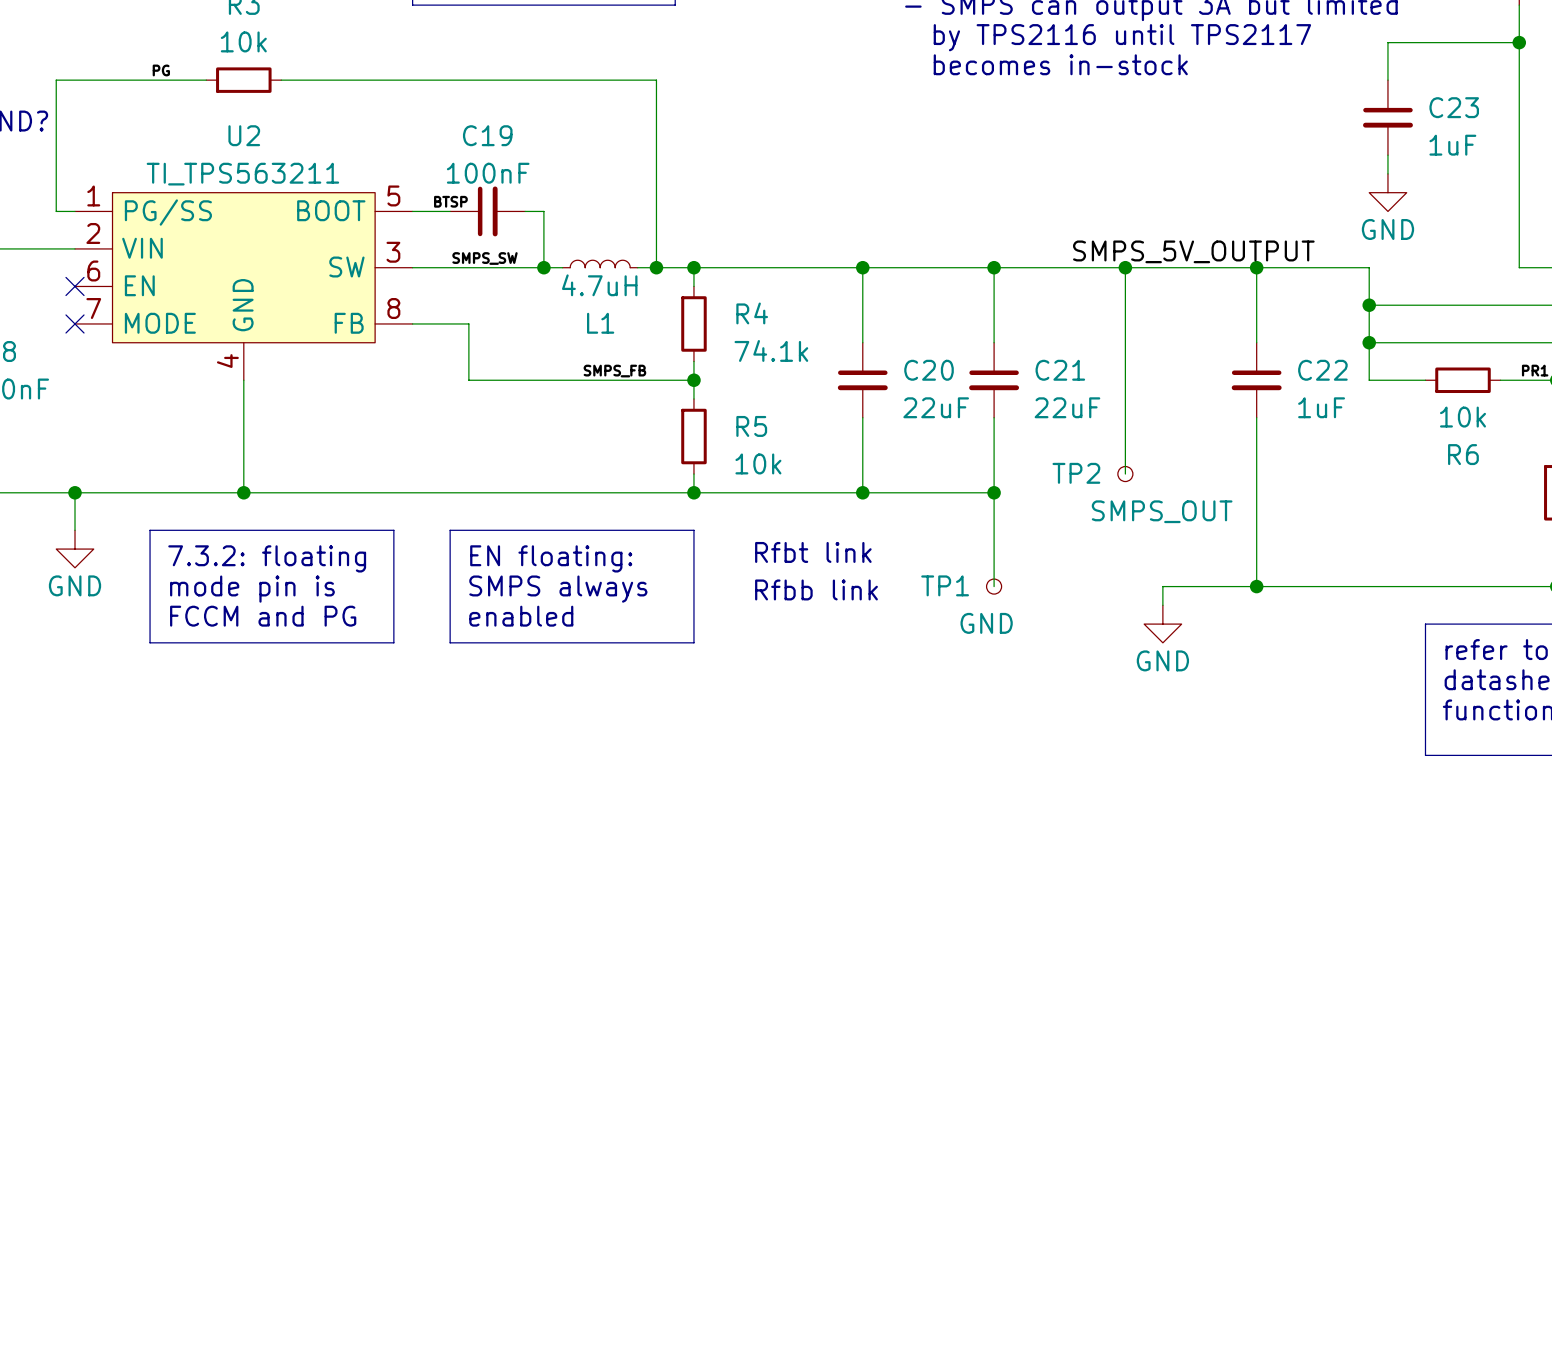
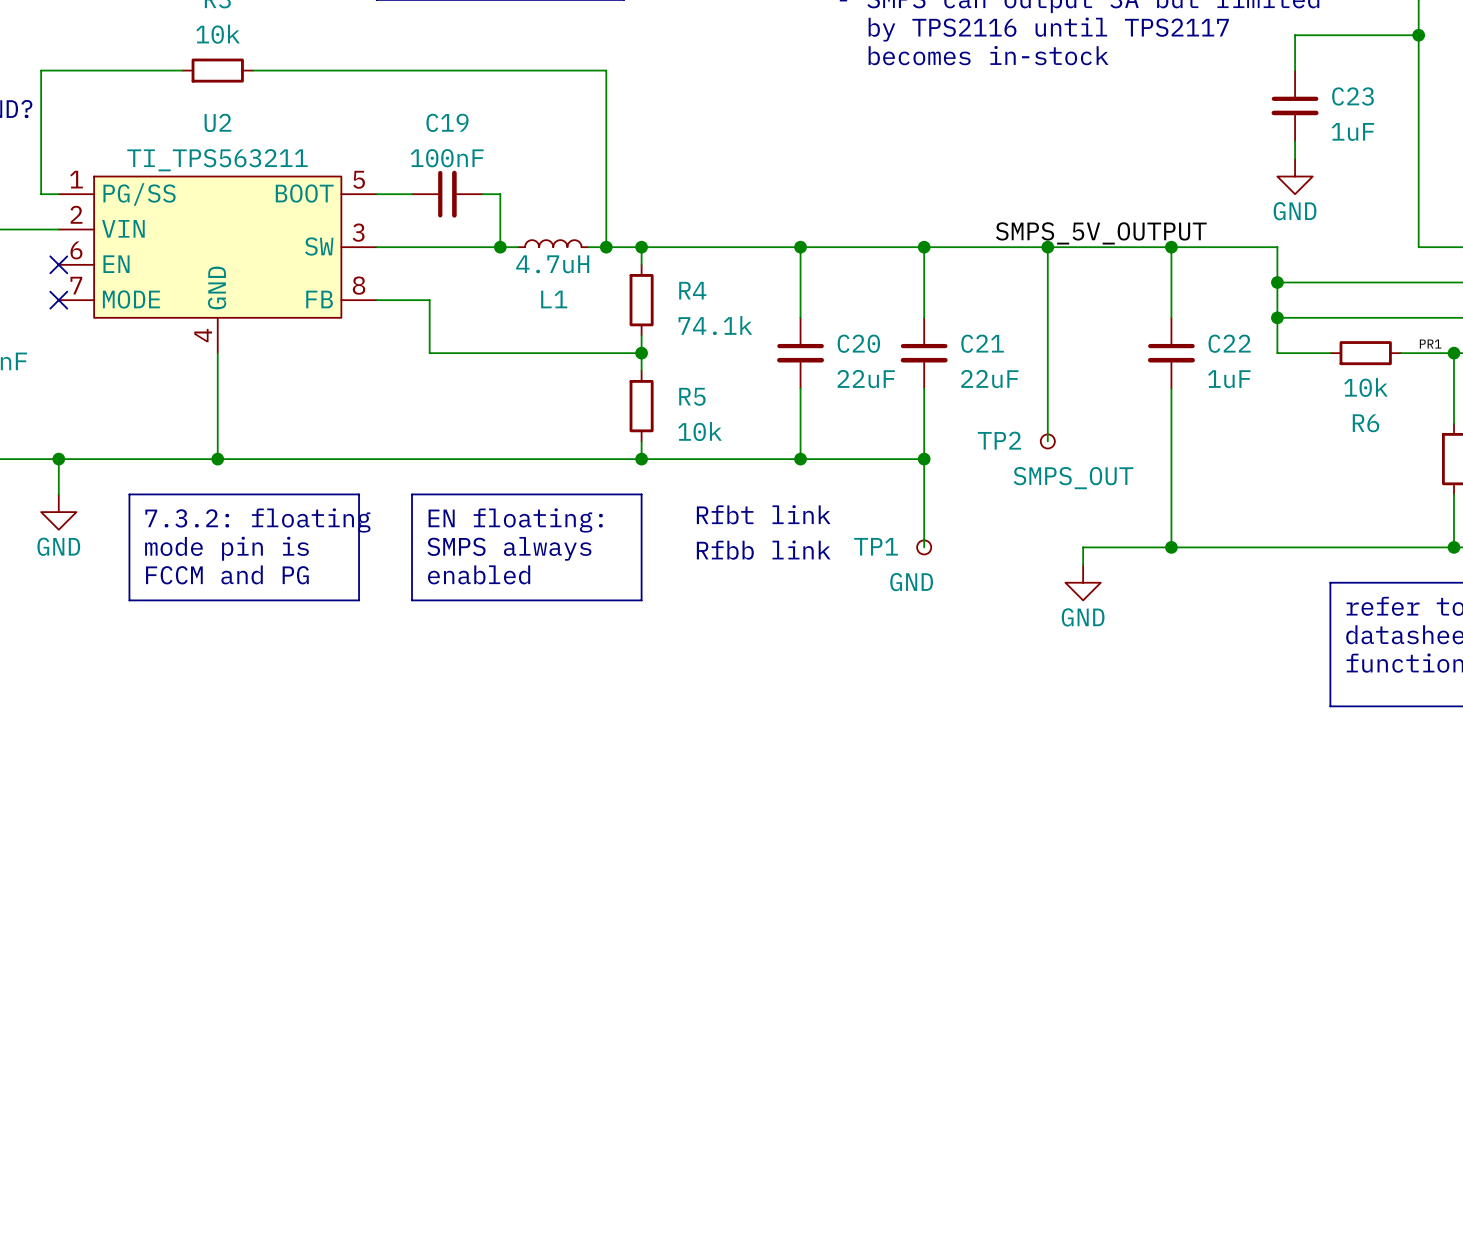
label: PG (161, 70) -> none
label: BTSP (450, 201) -> none
label: SMPS_SW (484, 258) -> none
label: SMPS_FB (614, 371) -> none

